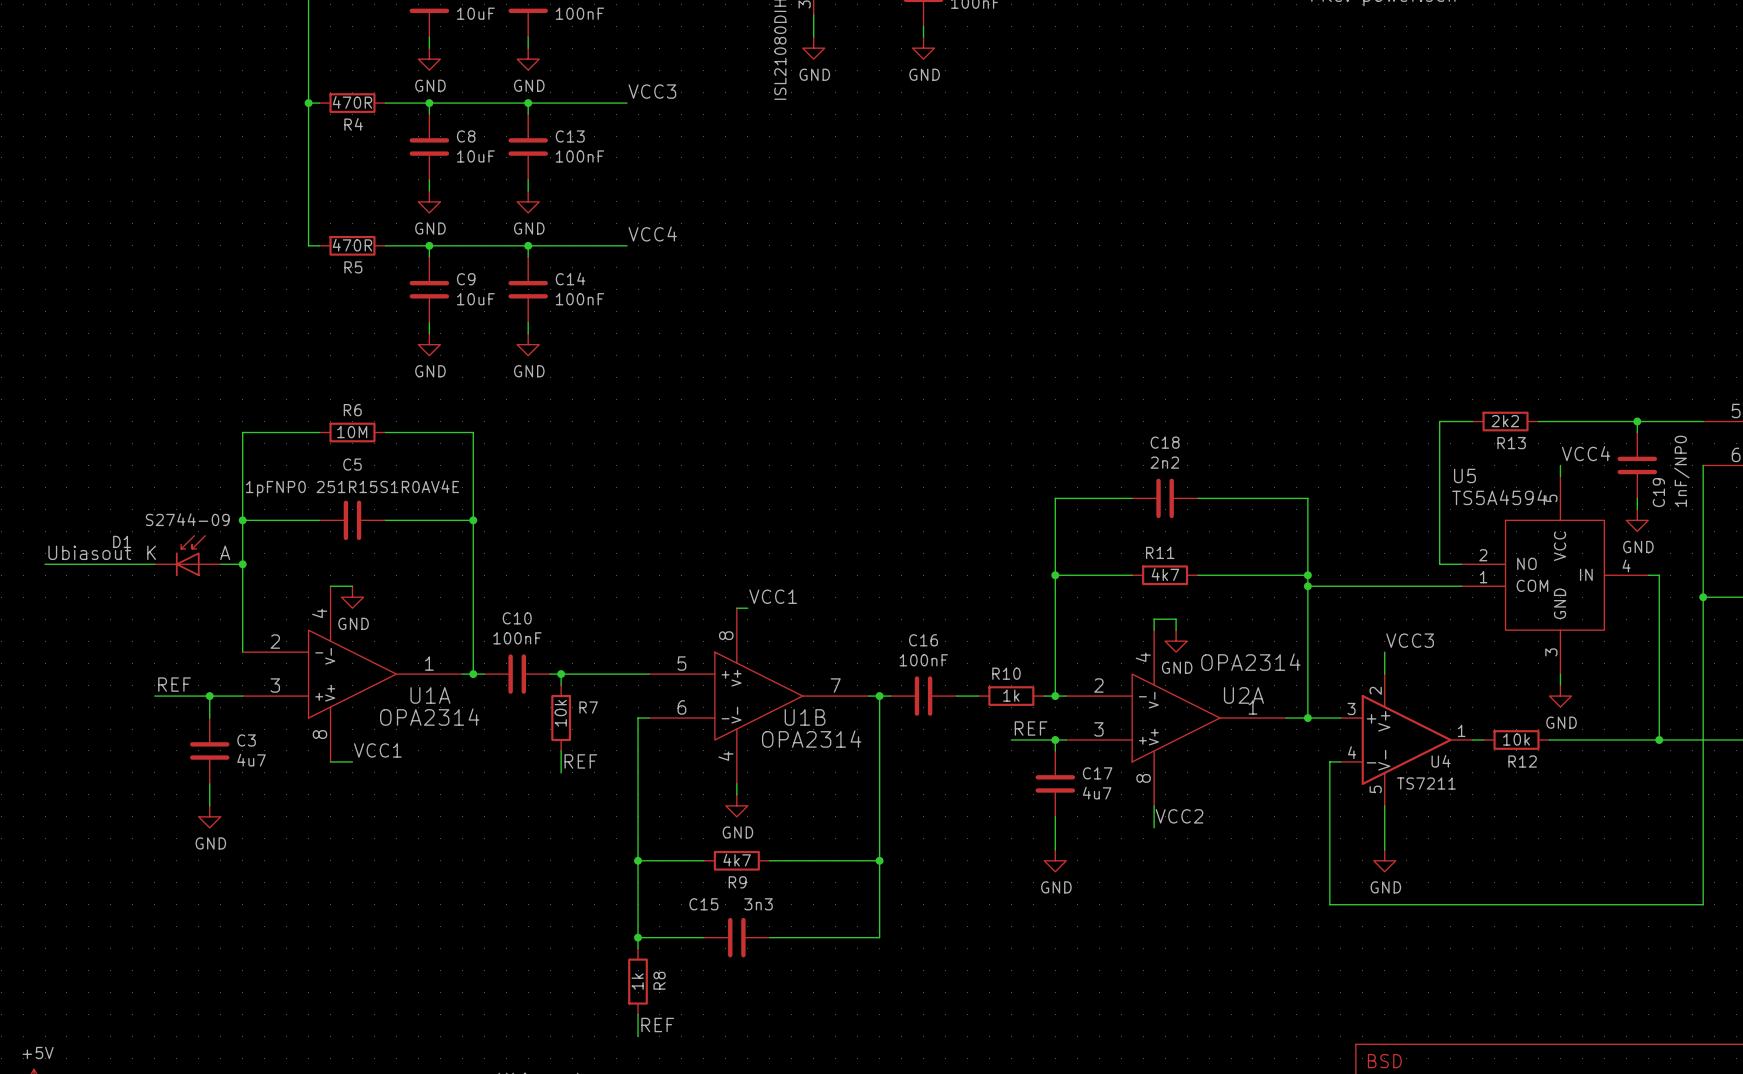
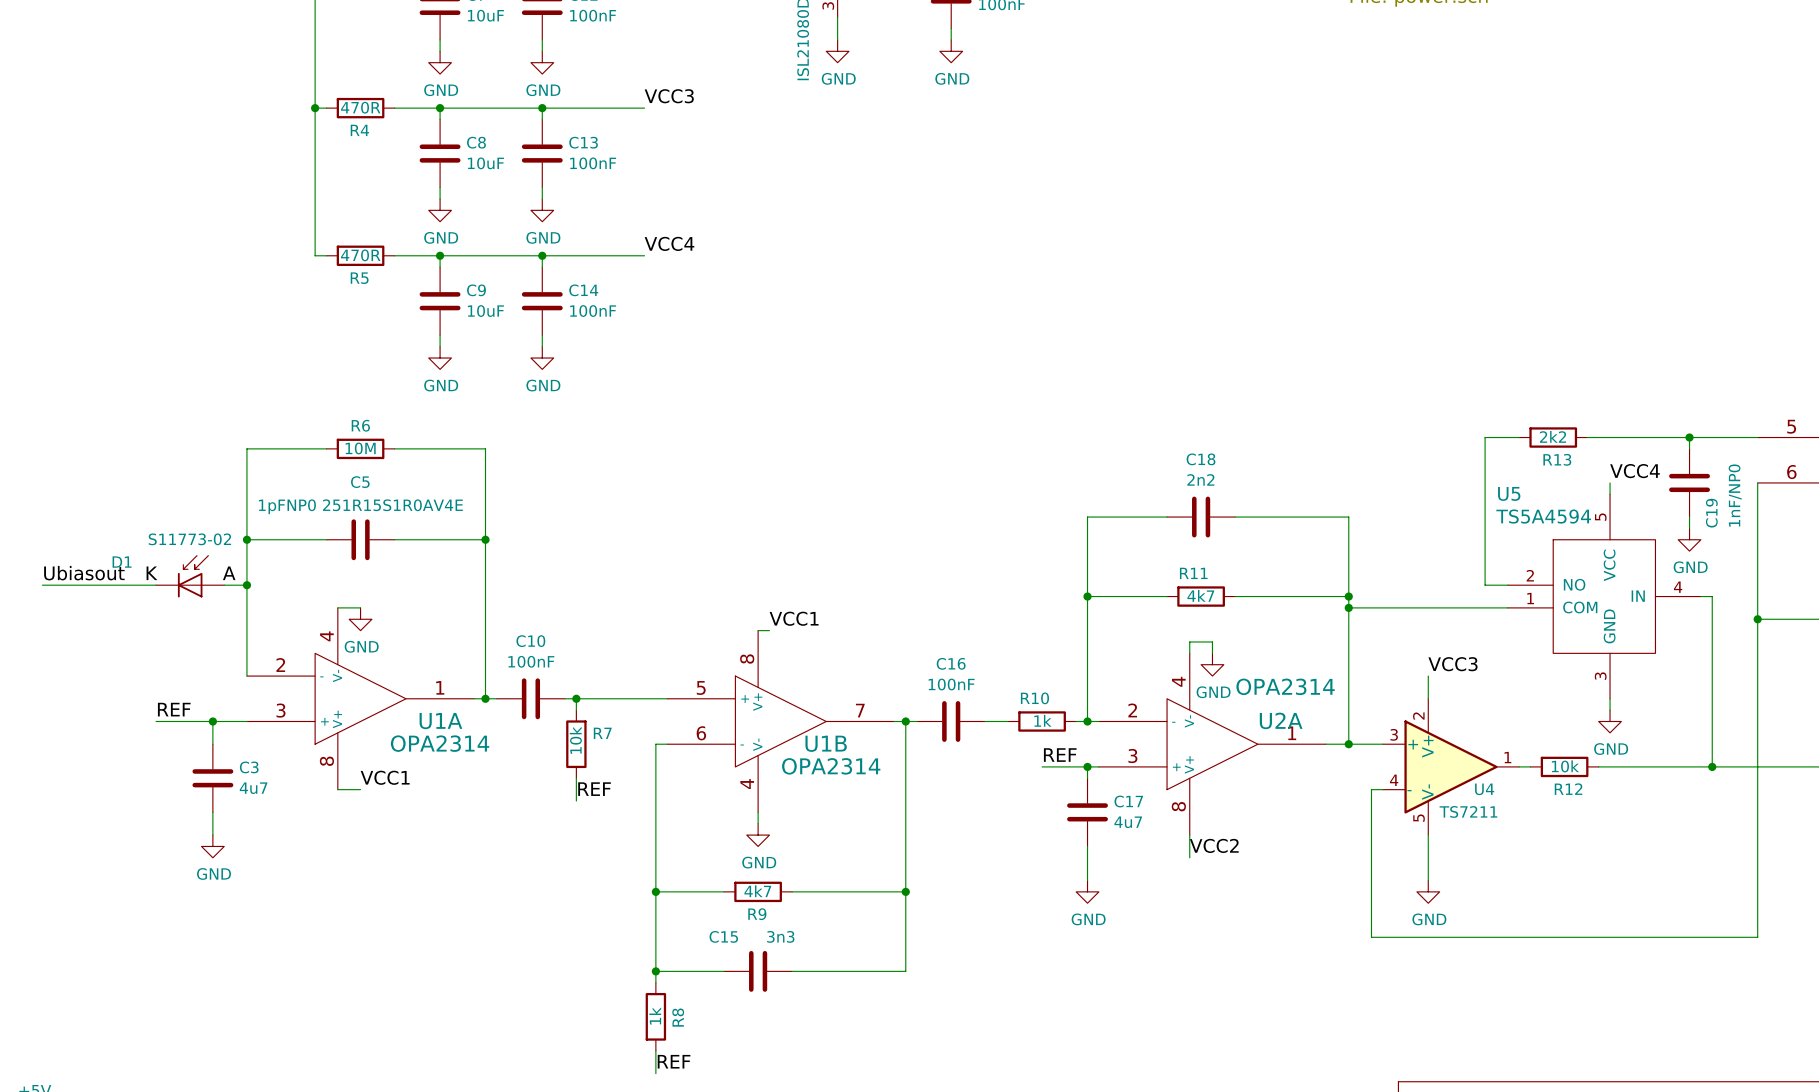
D1 value: S2744-09 (187, 519) -> S11773-02 (189, 539)

